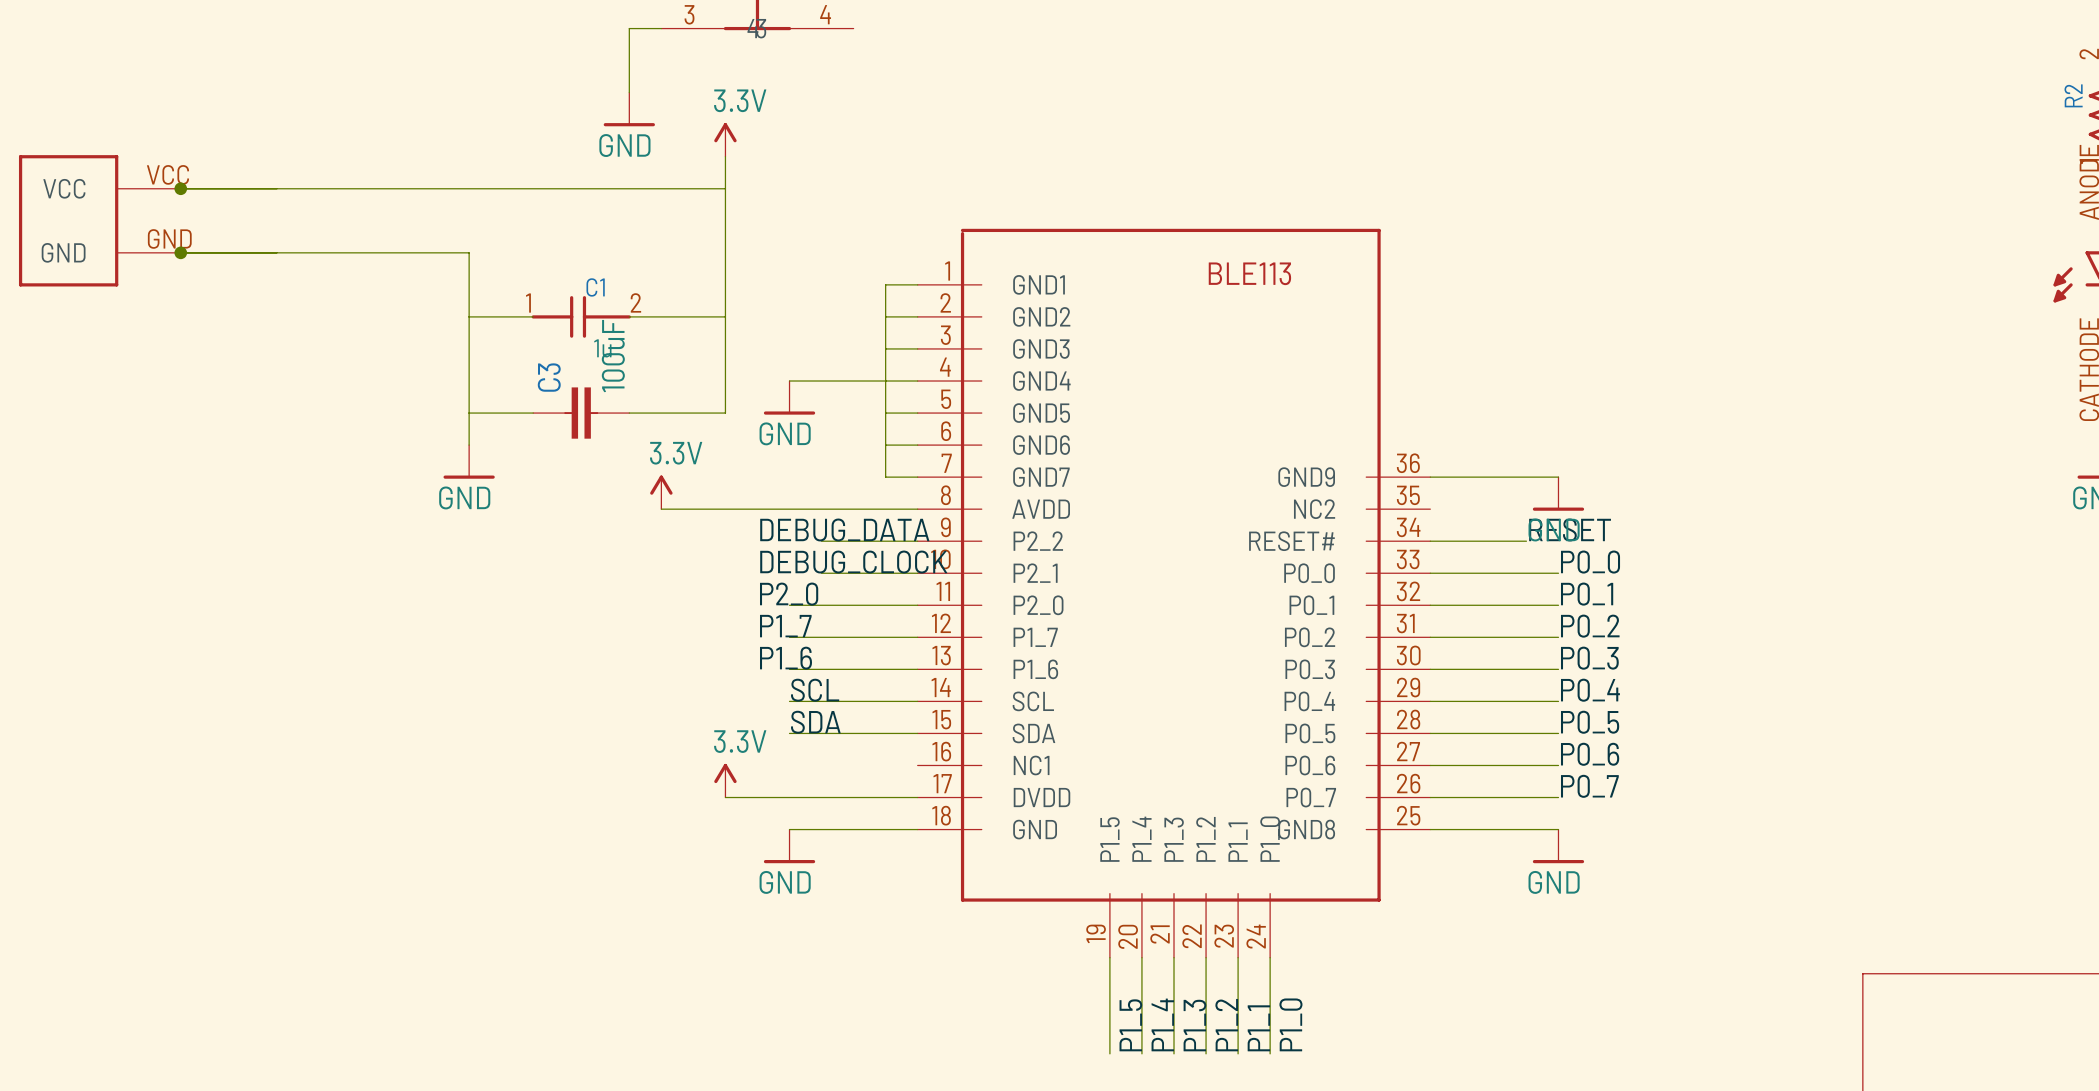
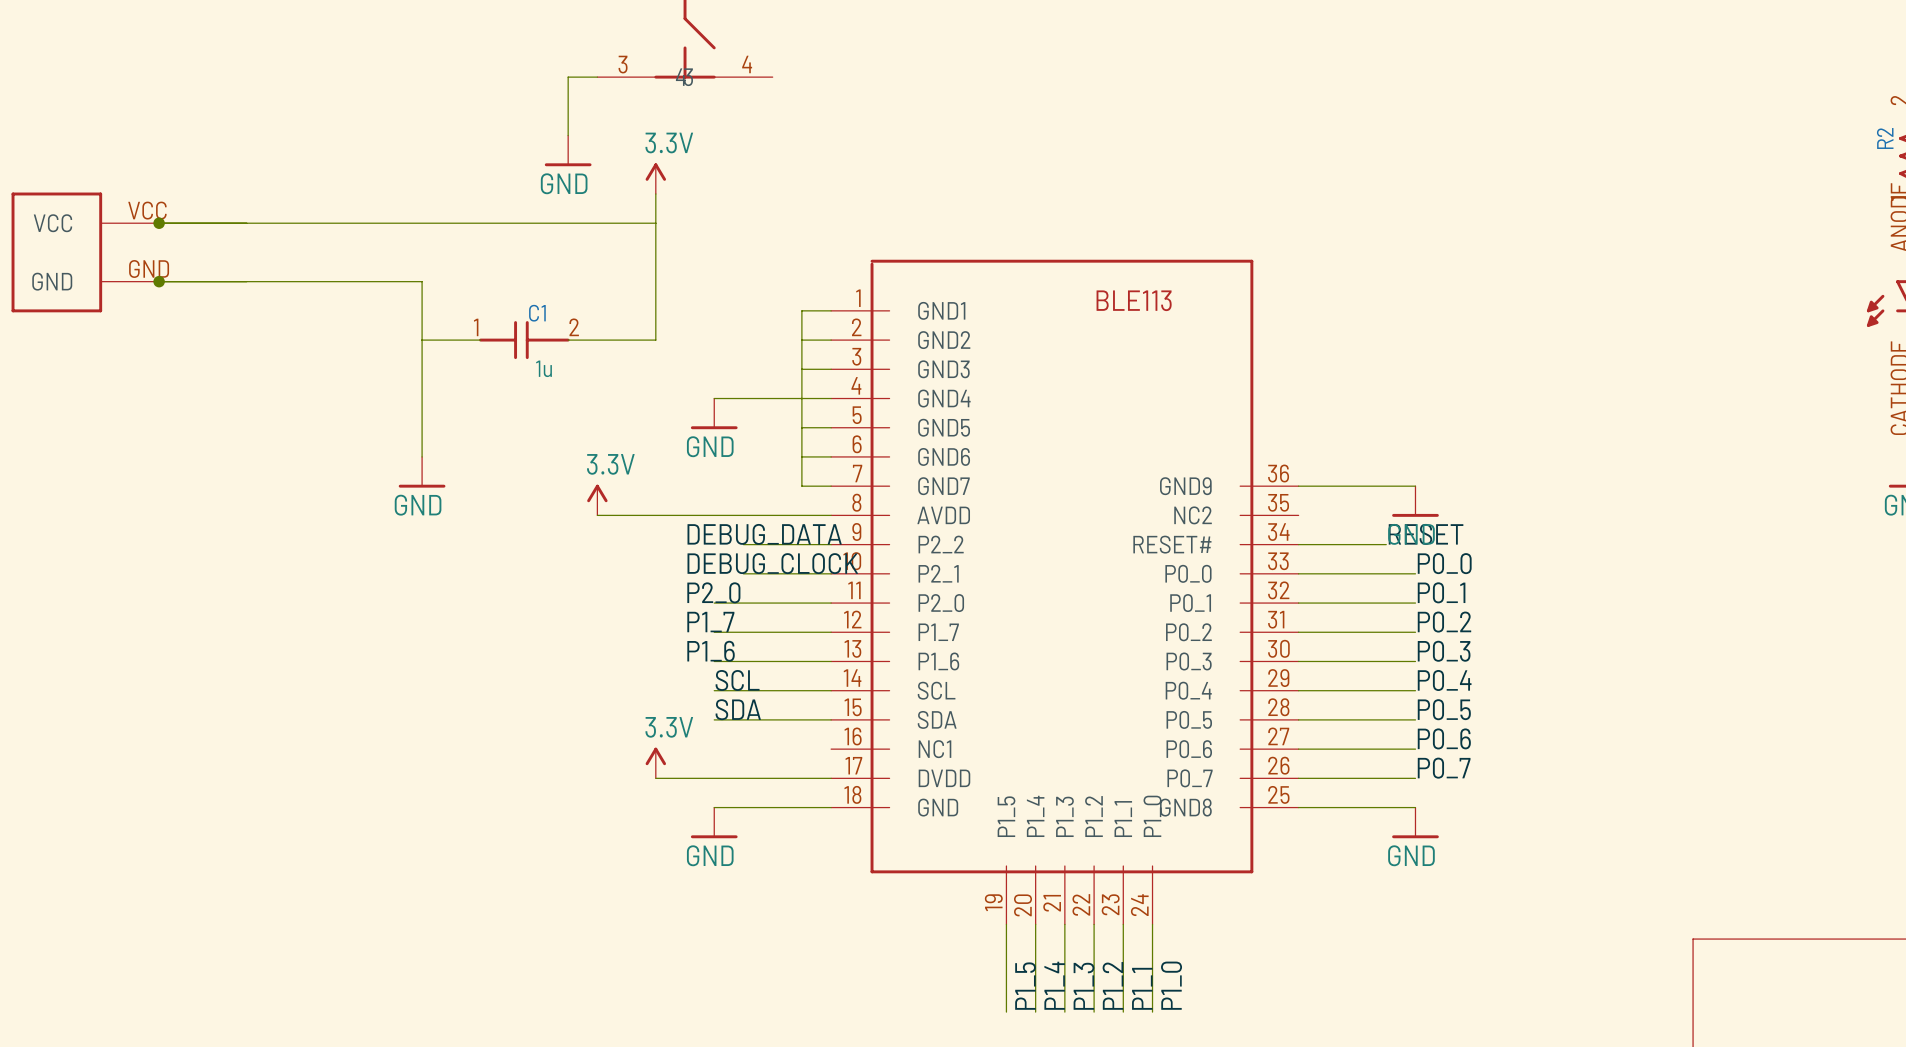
wire: (725, 316) (725, 413) (629, 413) -> none
wire: (469, 413) (533, 413) -> none
C3: 100uF (581, 413) -> none

